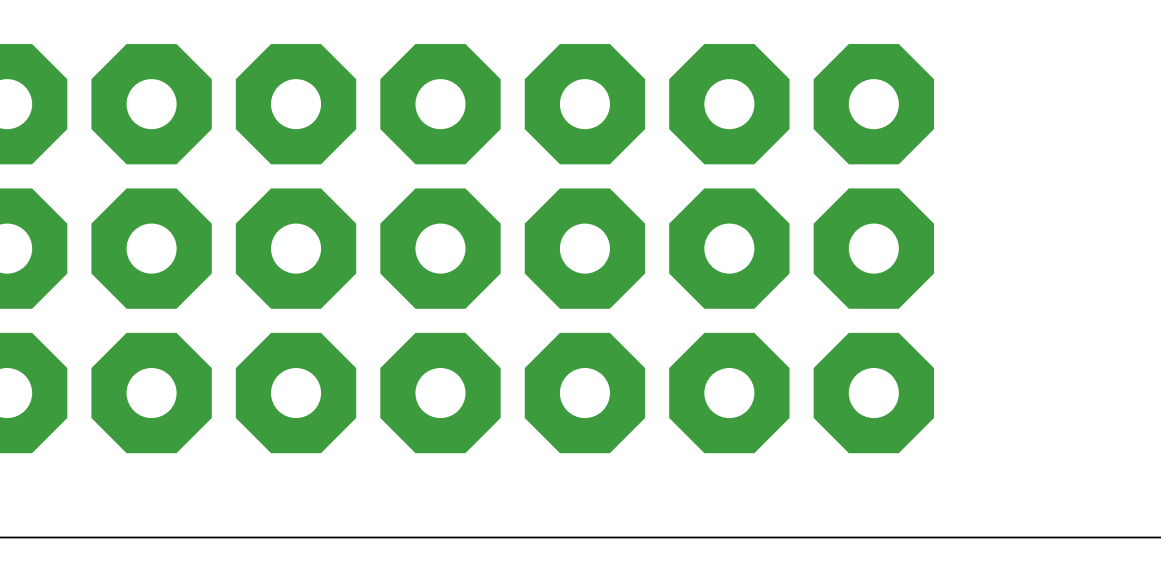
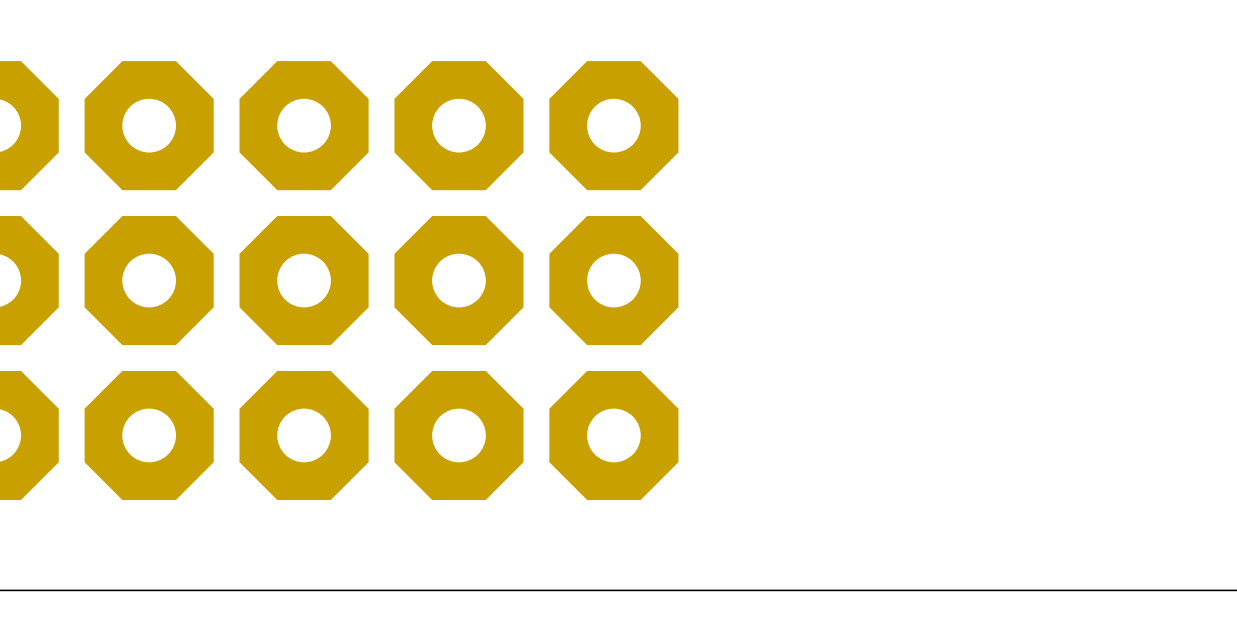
part: (729, 104) -> none
part: (873, 104) -> none
part: (729, 248) -> none
part: (873, 248) -> none
part: (729, 393) -> none
part: (873, 393) -> none

